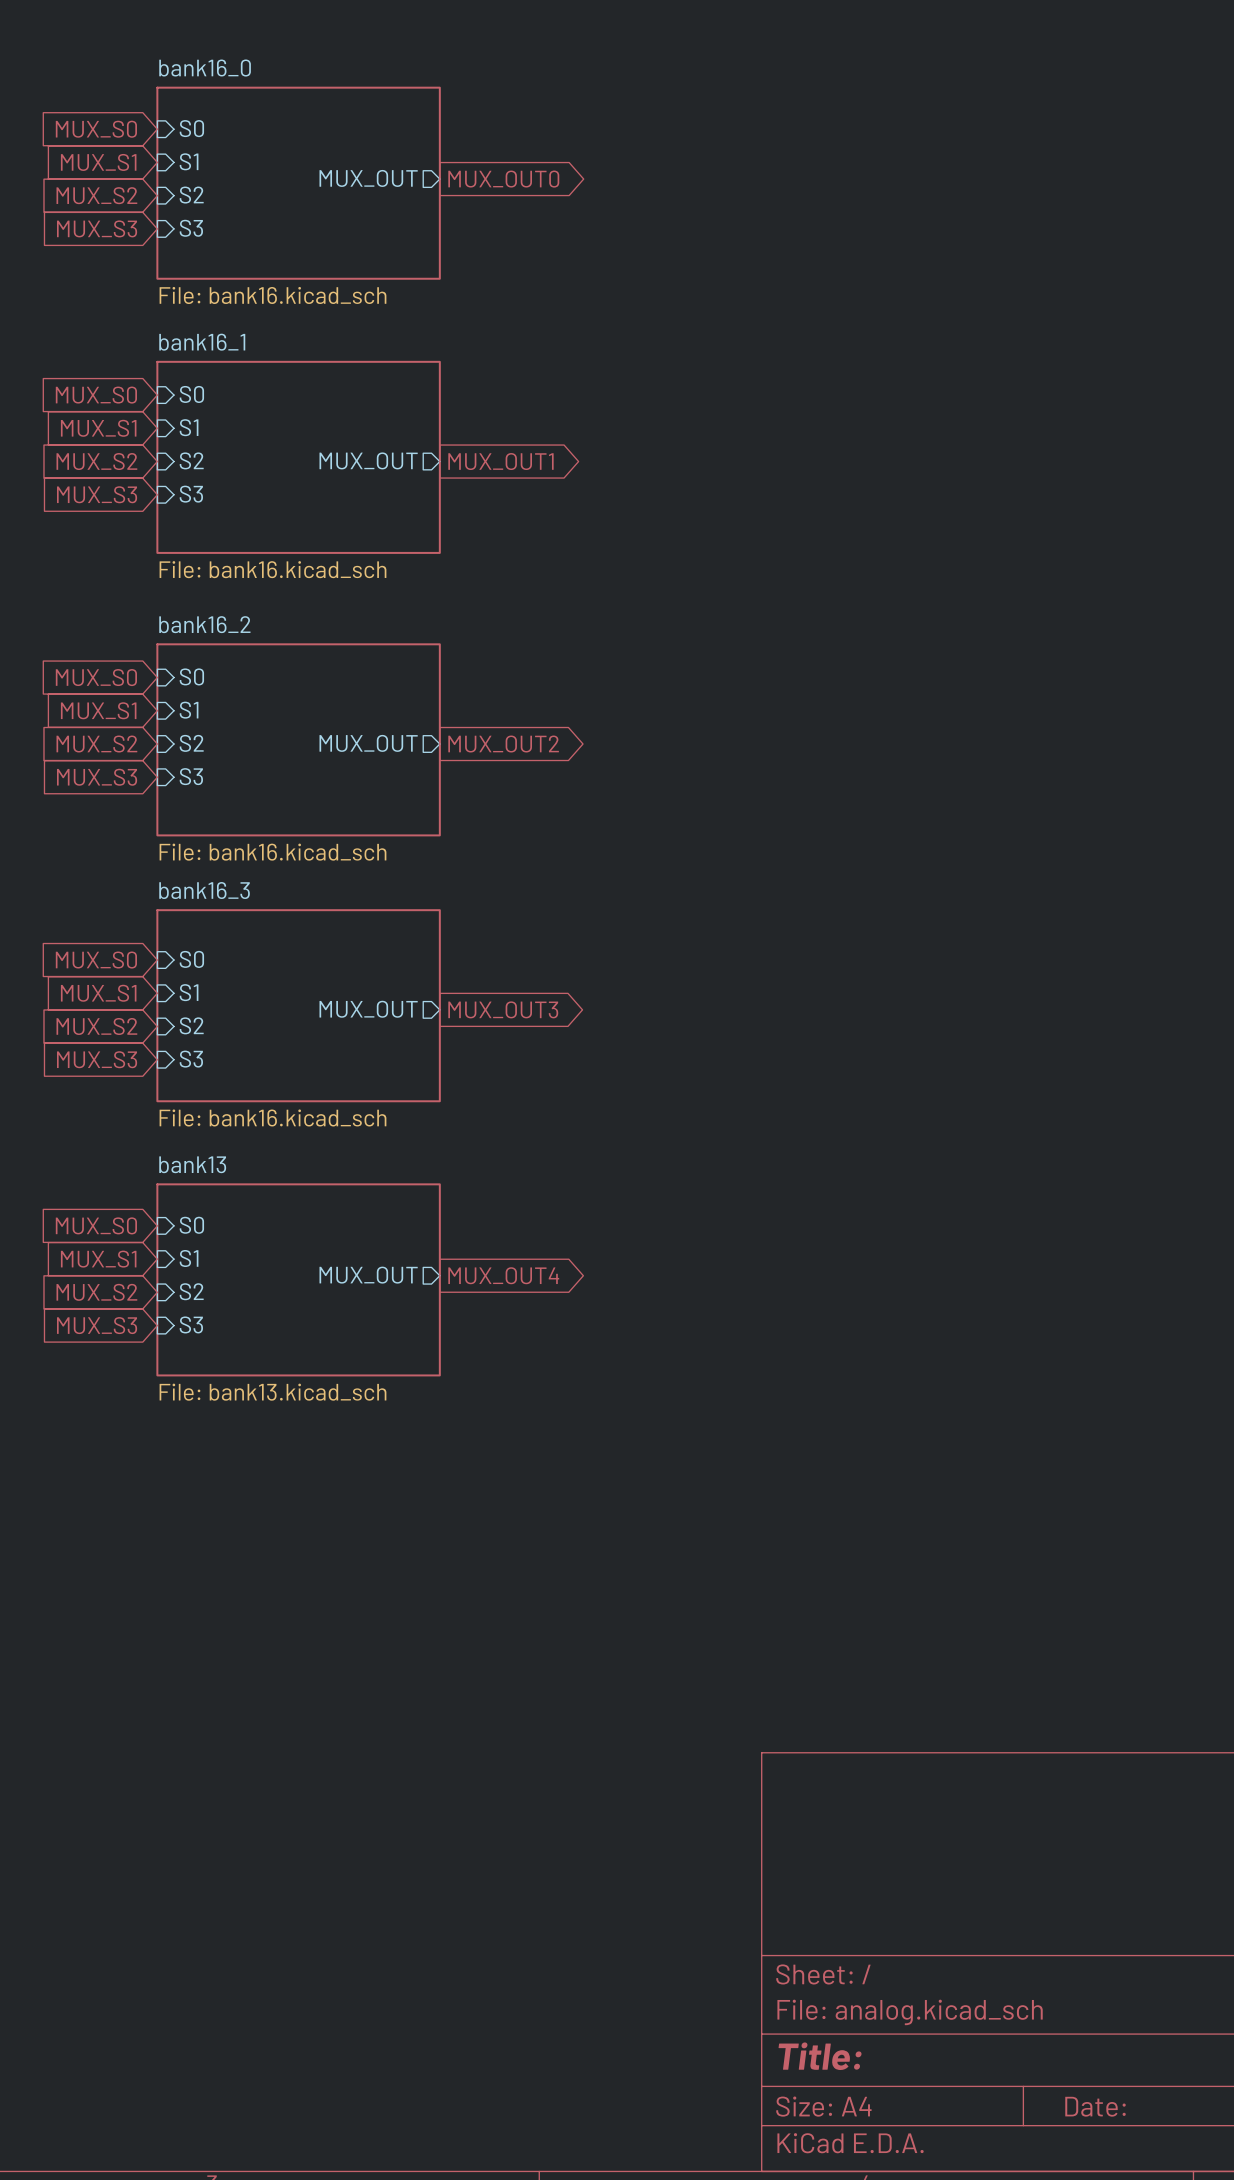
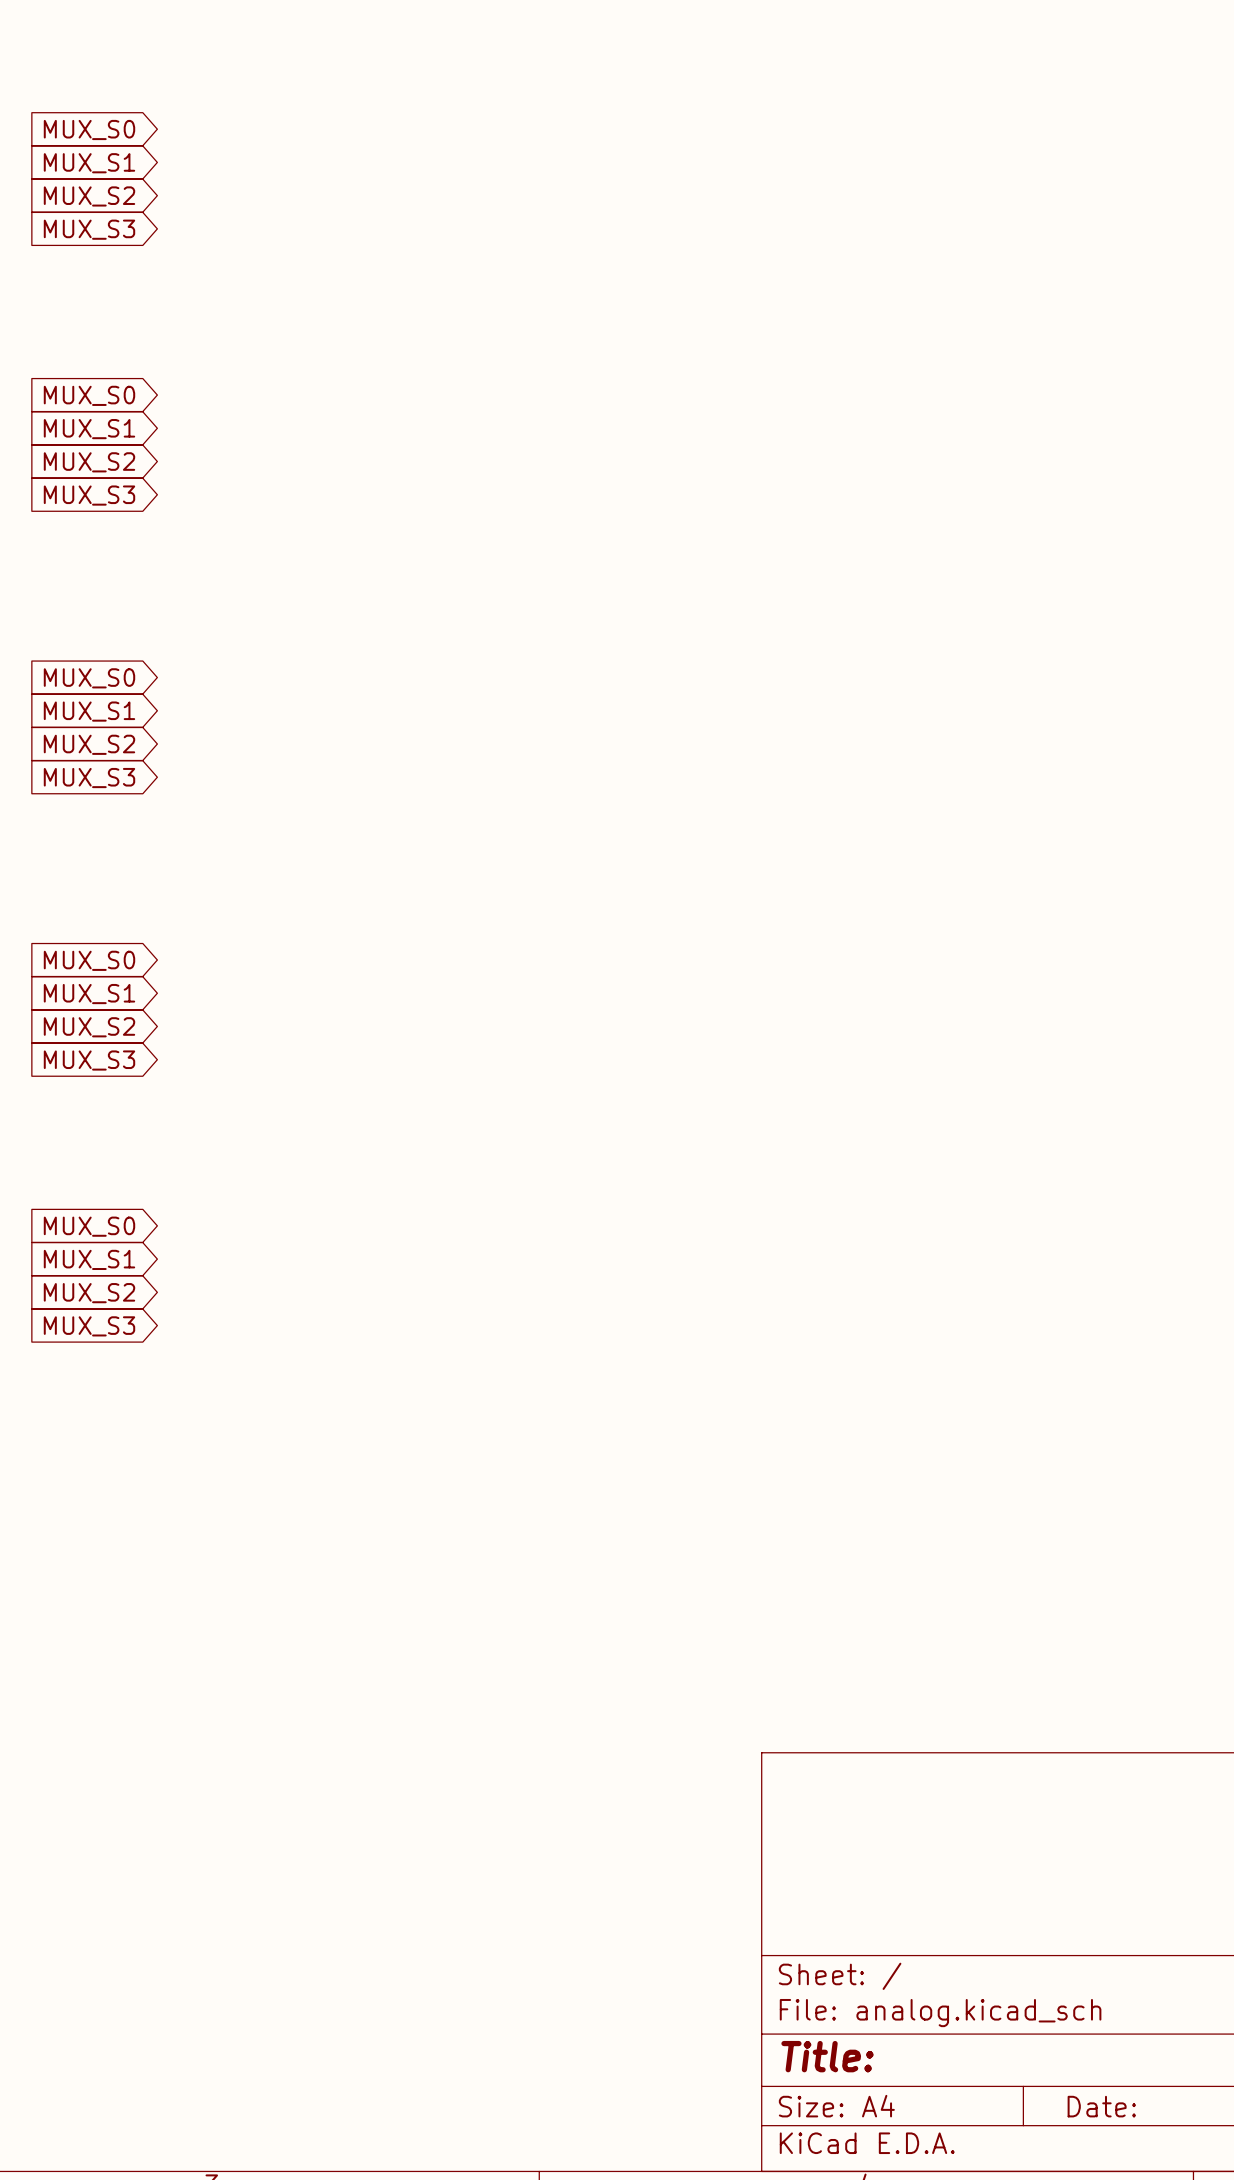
sheet pin: S0 (191, 128) -> none
sheet pin: S1 (189, 161) -> none
sheet pin: MUX_OUT (368, 178) -> none
global label: MUX_OUT0 (503, 179) -> none
sheet bank16_0: File: bank16.kicad_sch (298, 183) -> none
sheet pin: S2 (191, 195) -> none
sheet pin: S3 (191, 228) -> none
sheet pin: S0 (191, 394) -> none
sheet pin: S1 (189, 427) -> none
sheet bank16_1: File: bank16.kicad_sch (298, 457) -> none
sheet pin: S2 (191, 460) -> none
sheet pin: MUX_OUT (368, 460) -> none
global label: MUX_OUT1 (500, 461) -> none
sheet pin: S3 (191, 494) -> none
sheet pin: S0 (191, 676) -> none
sheet pin: S1 (189, 710) -> none
sheet bank16_2: File: bank16.kicad_sch (298, 739) -> none
sheet pin: S2 (191, 743) -> none
sheet pin: MUX_OUT (368, 743) -> none
global label: MUX_OUT2 (503, 744) -> none
sheet pin: S3 (191, 776) -> none
sheet pin: S0 (191, 959) -> none
sheet pin: S1 (189, 992) -> none
sheet bank16_3: File: bank16.kicad_sch (298, 1005) -> none
sheet pin: MUX_OUT (368, 1009) -> none
global label: MUX_OUT3 (503, 1009) -> none
sheet pin: S2 (191, 1025) -> none
sheet pin: S3 (191, 1059) -> none
sheet pin: S0 (191, 1225) -> none
sheet pin: S1 (189, 1258) -> none
sheet pin: MUX_OUT (368, 1275) -> none
global label: MUX_OUT4 (503, 1275) -> none
sheet bank13: File: bank13.kicad_sch (298, 1279) -> none
sheet pin: S2 (191, 1291) -> none
sheet pin: S3 (191, 1324) -> none

